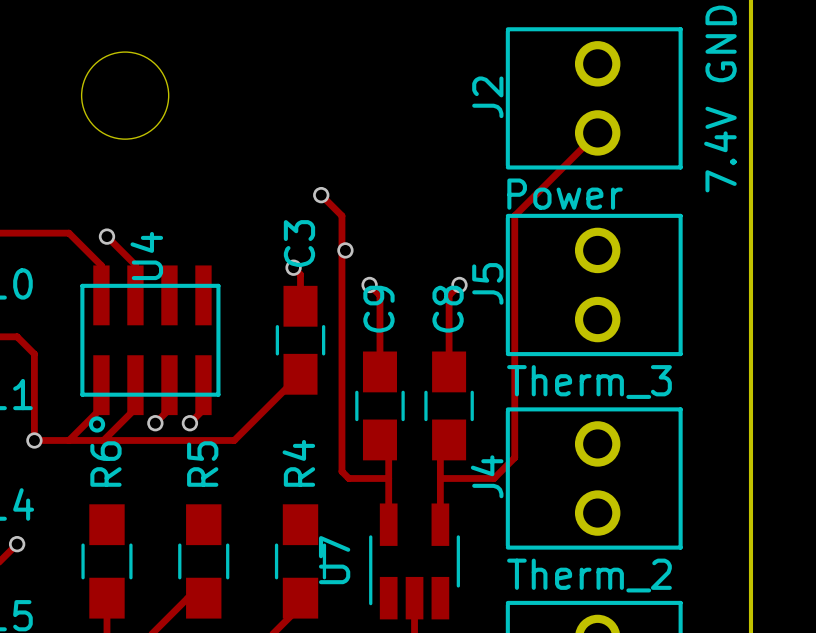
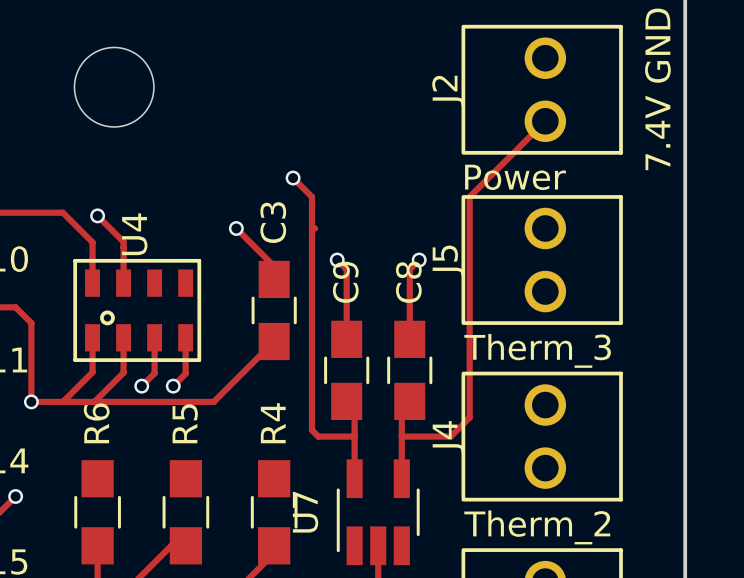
via: (345, 250) -> none
U4 footprint: [80, 265, 221, 433] -> [73, 258, 202, 362]
track: (293, 267) (300, 274) (300, 291) -> (236, 228) (274, 266)
via position: (293, 267) -> (236, 228)

